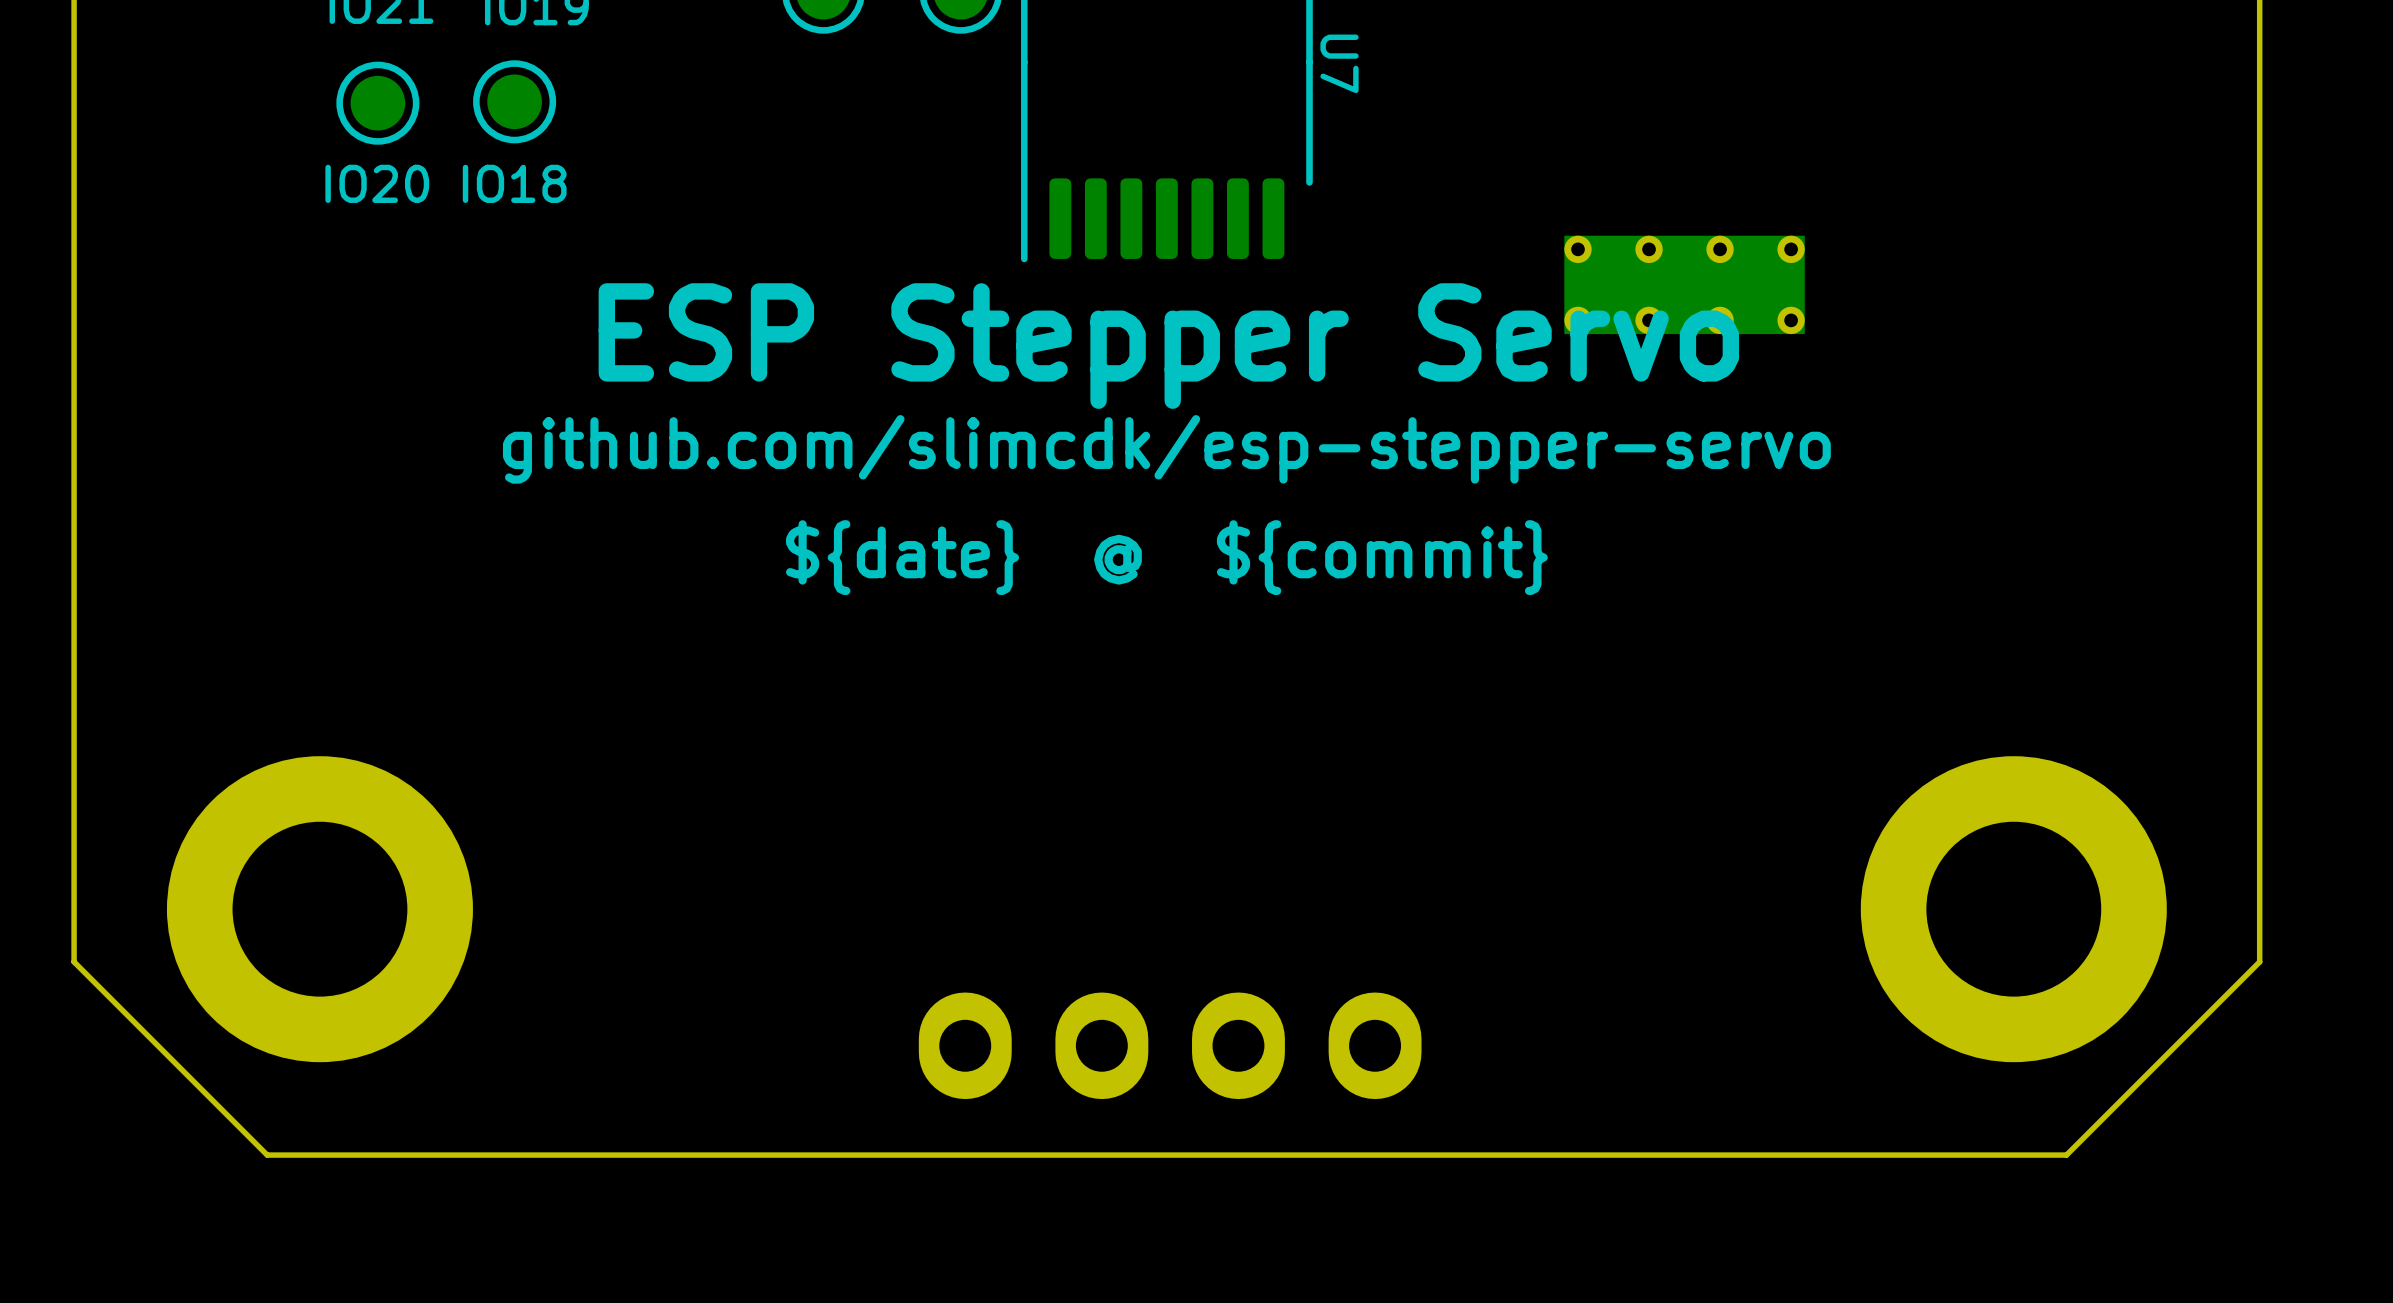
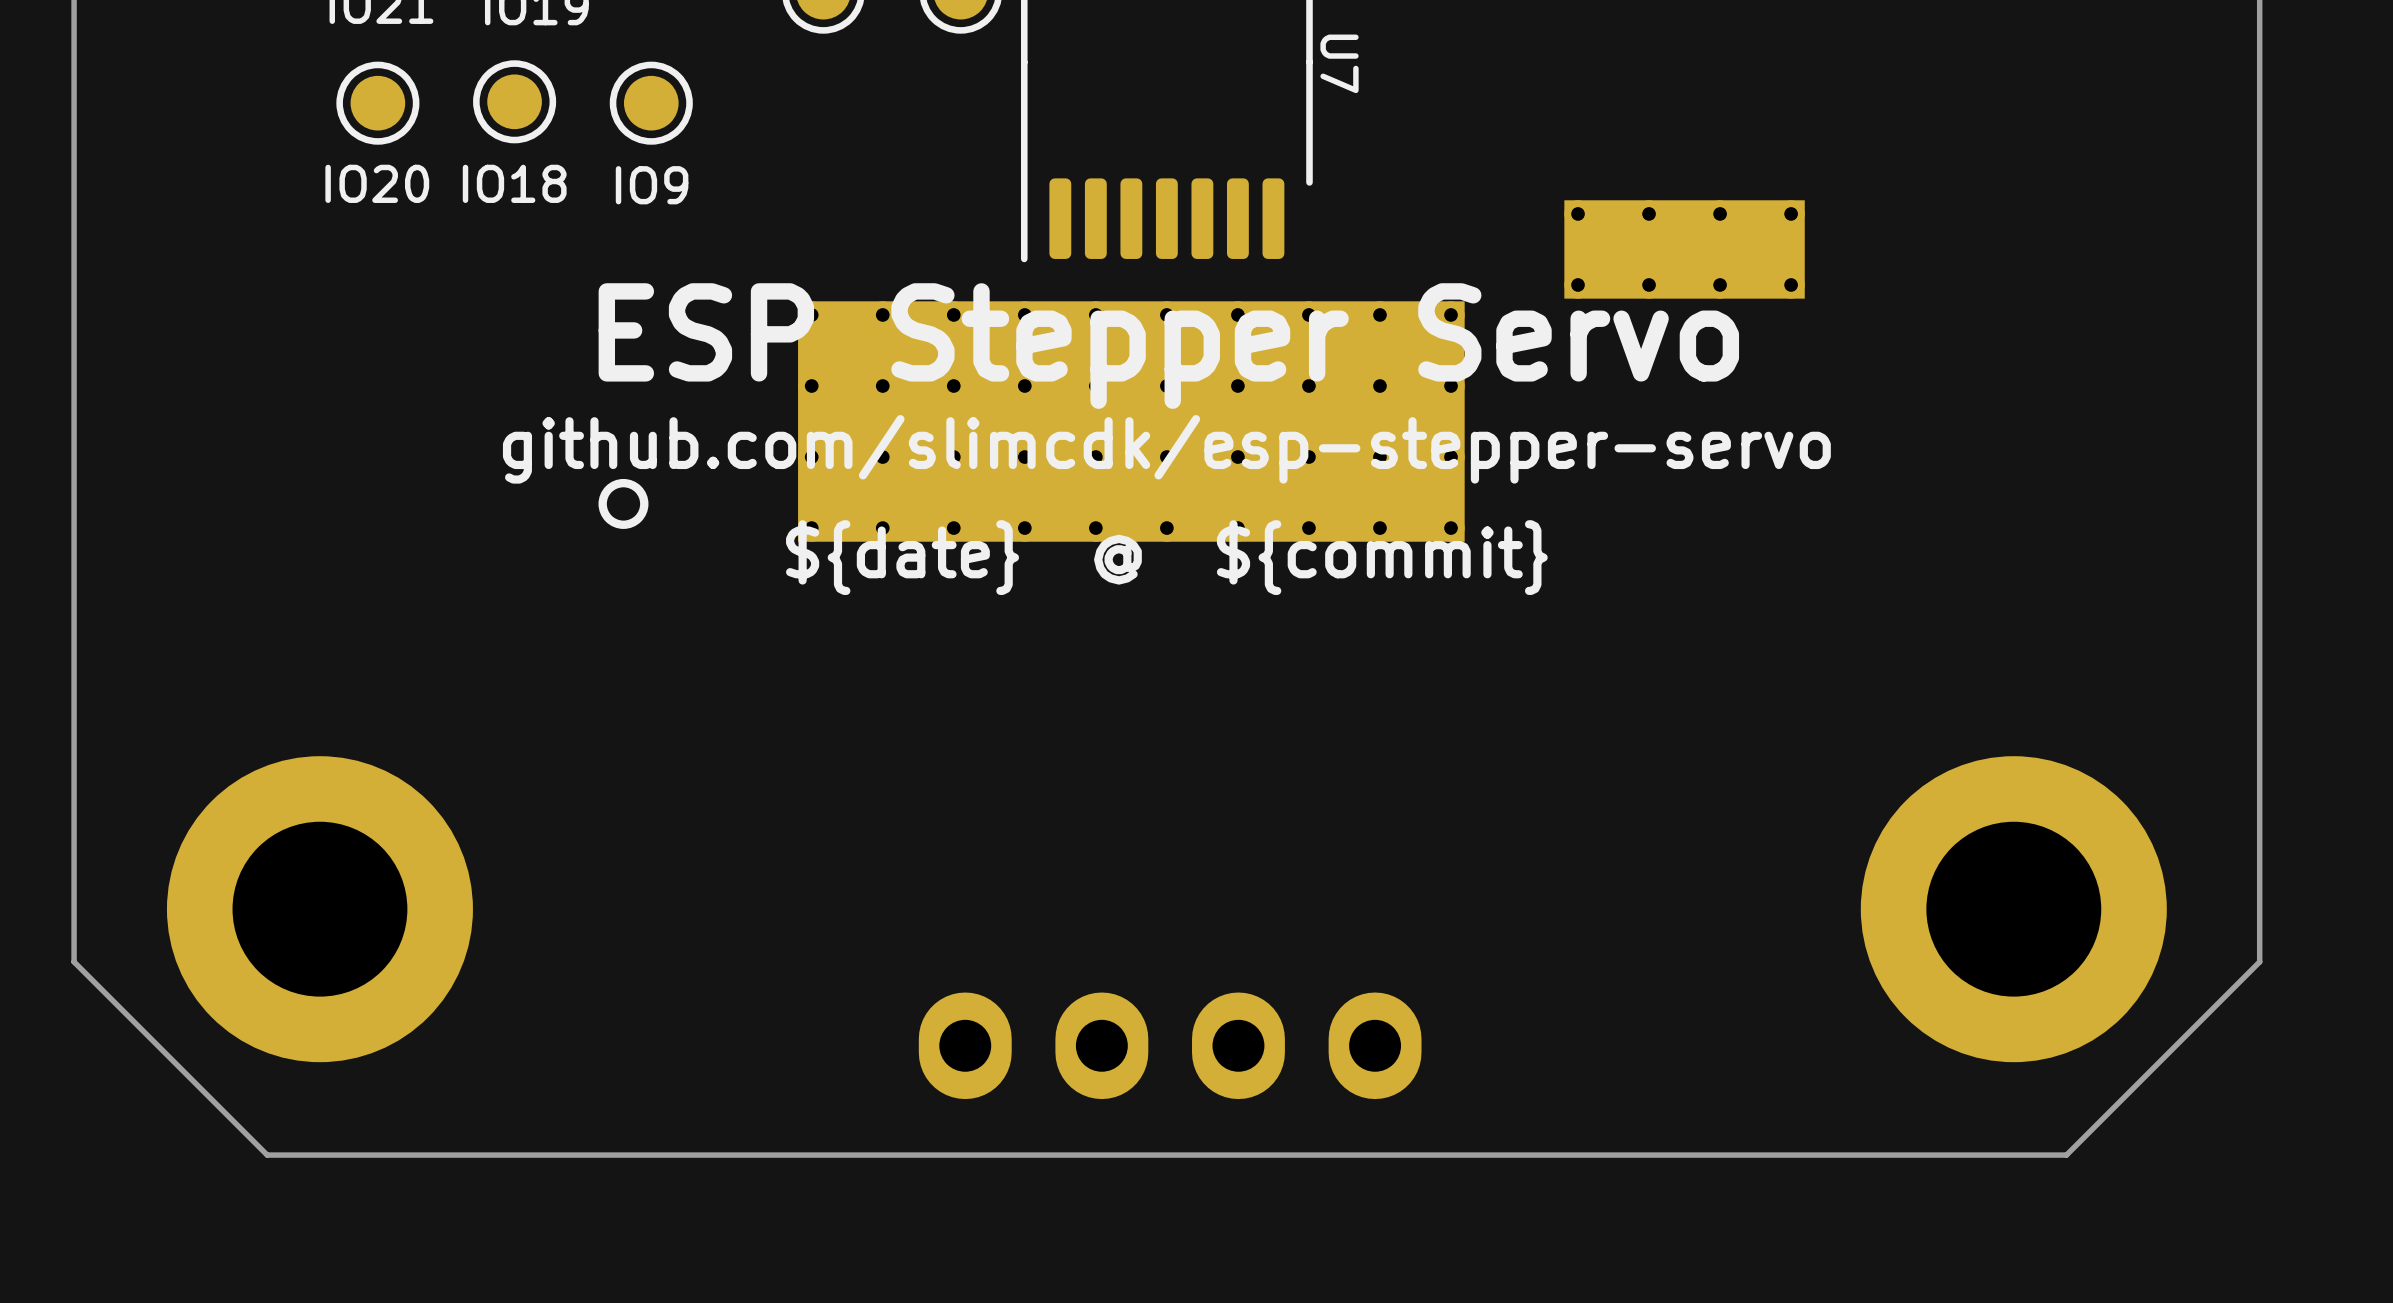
part: none -> (651, 103)
text: none -> IO9 (652, 185)
part position: (1684, 284) -> (1684, 249)
part: none -> (1131, 421)
part: none -> (623, 503)

